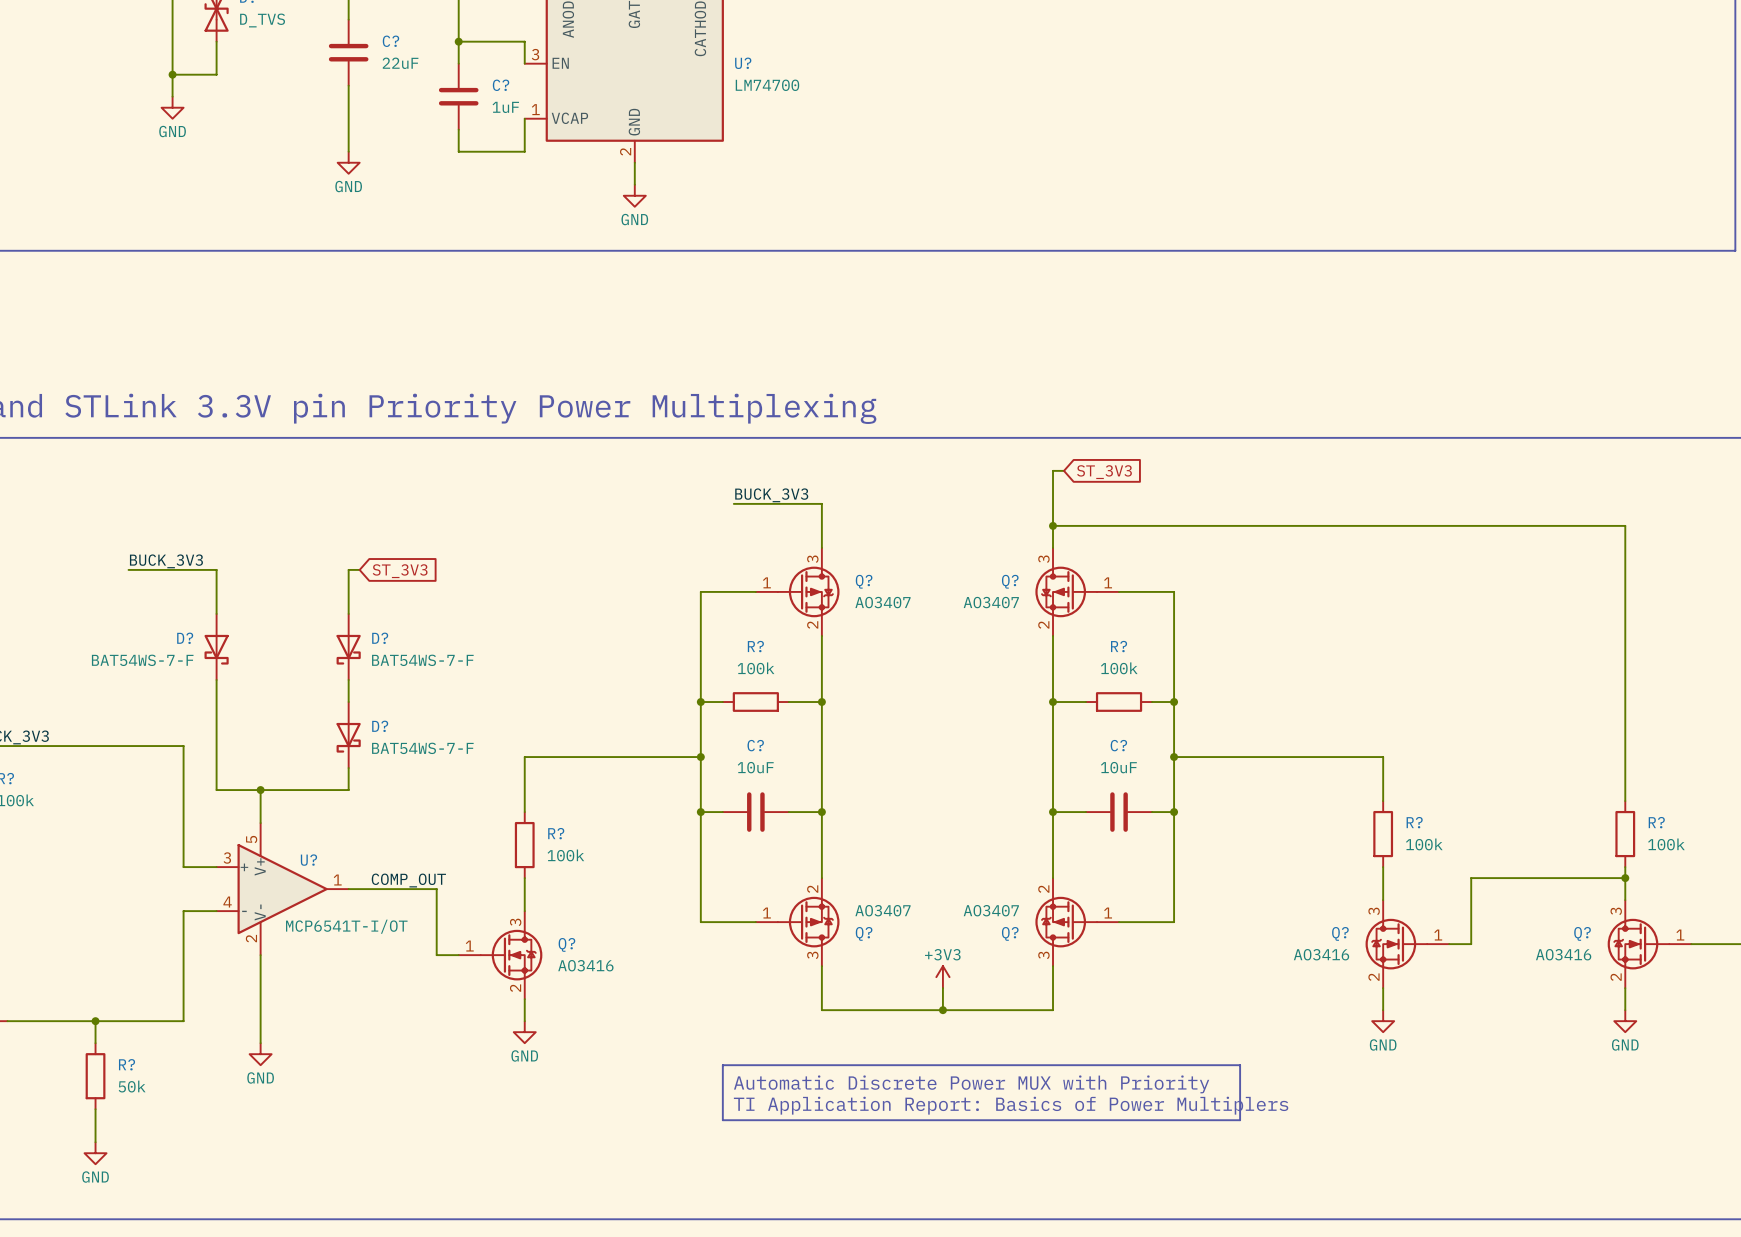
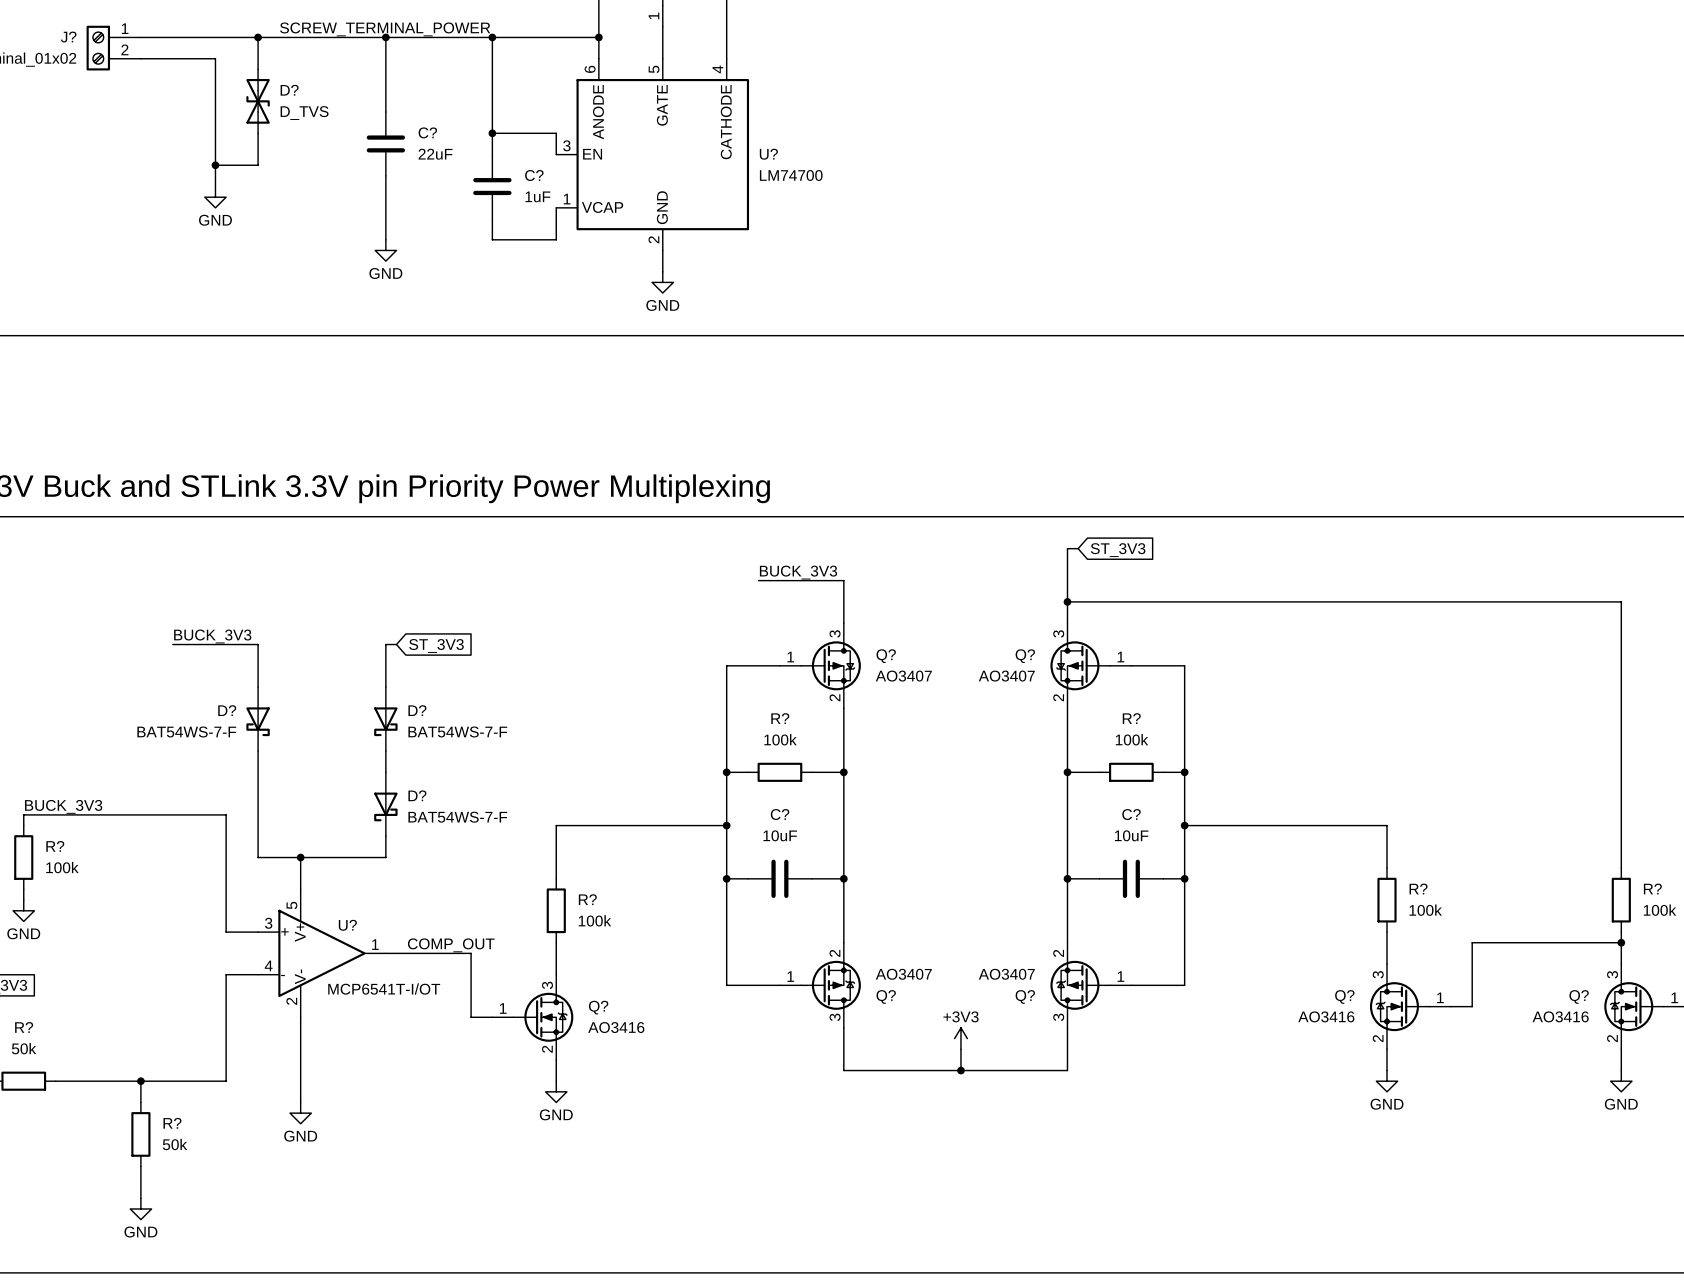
line: (722, 1065) (1240, 1065) (1240, 1120) (722, 1120) (722, 1065) -> none
text: Automatic Discrete Power MUX with Priority (971, 1084) -> none
text: TI Application Report: Basics of Power Multiplers (1011, 1105) -> none

